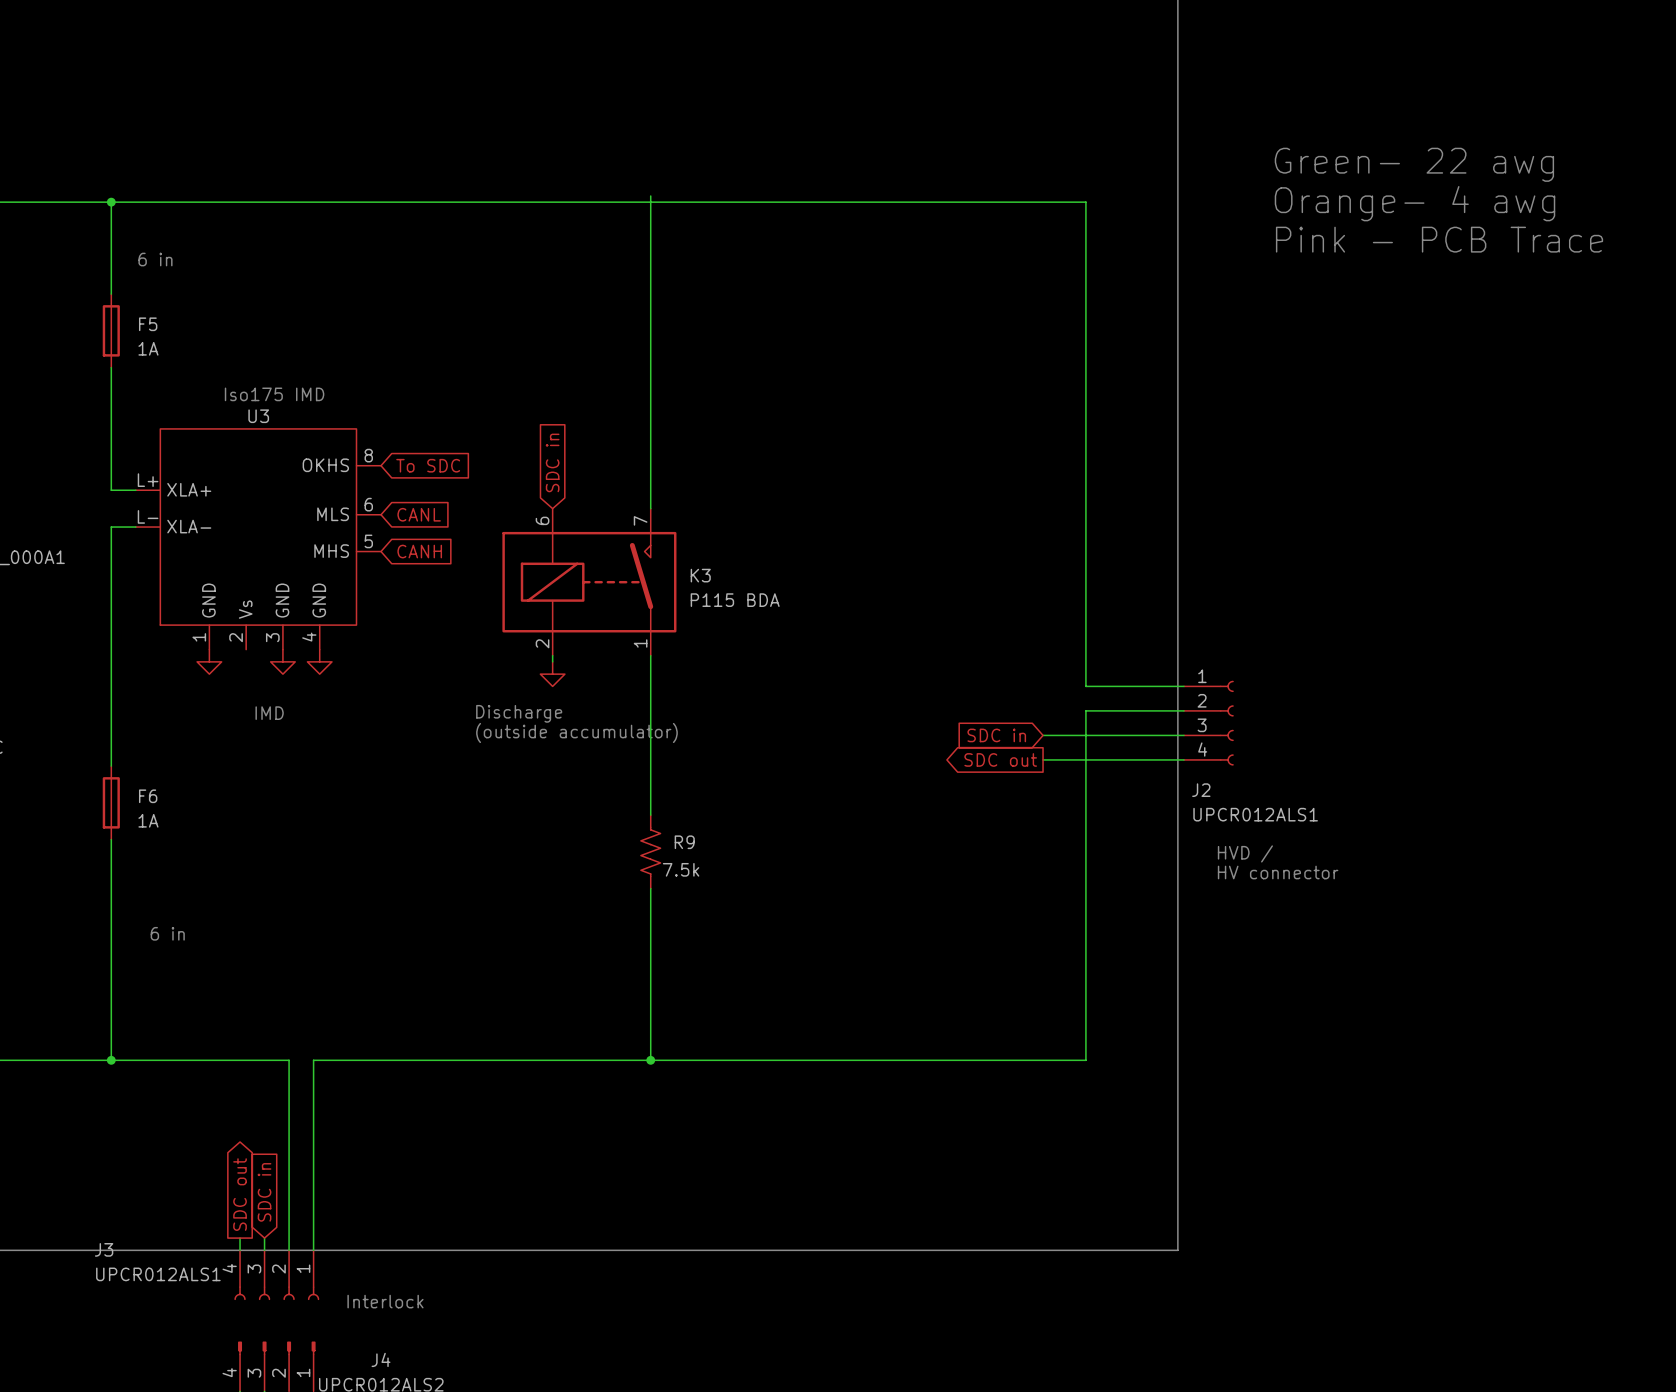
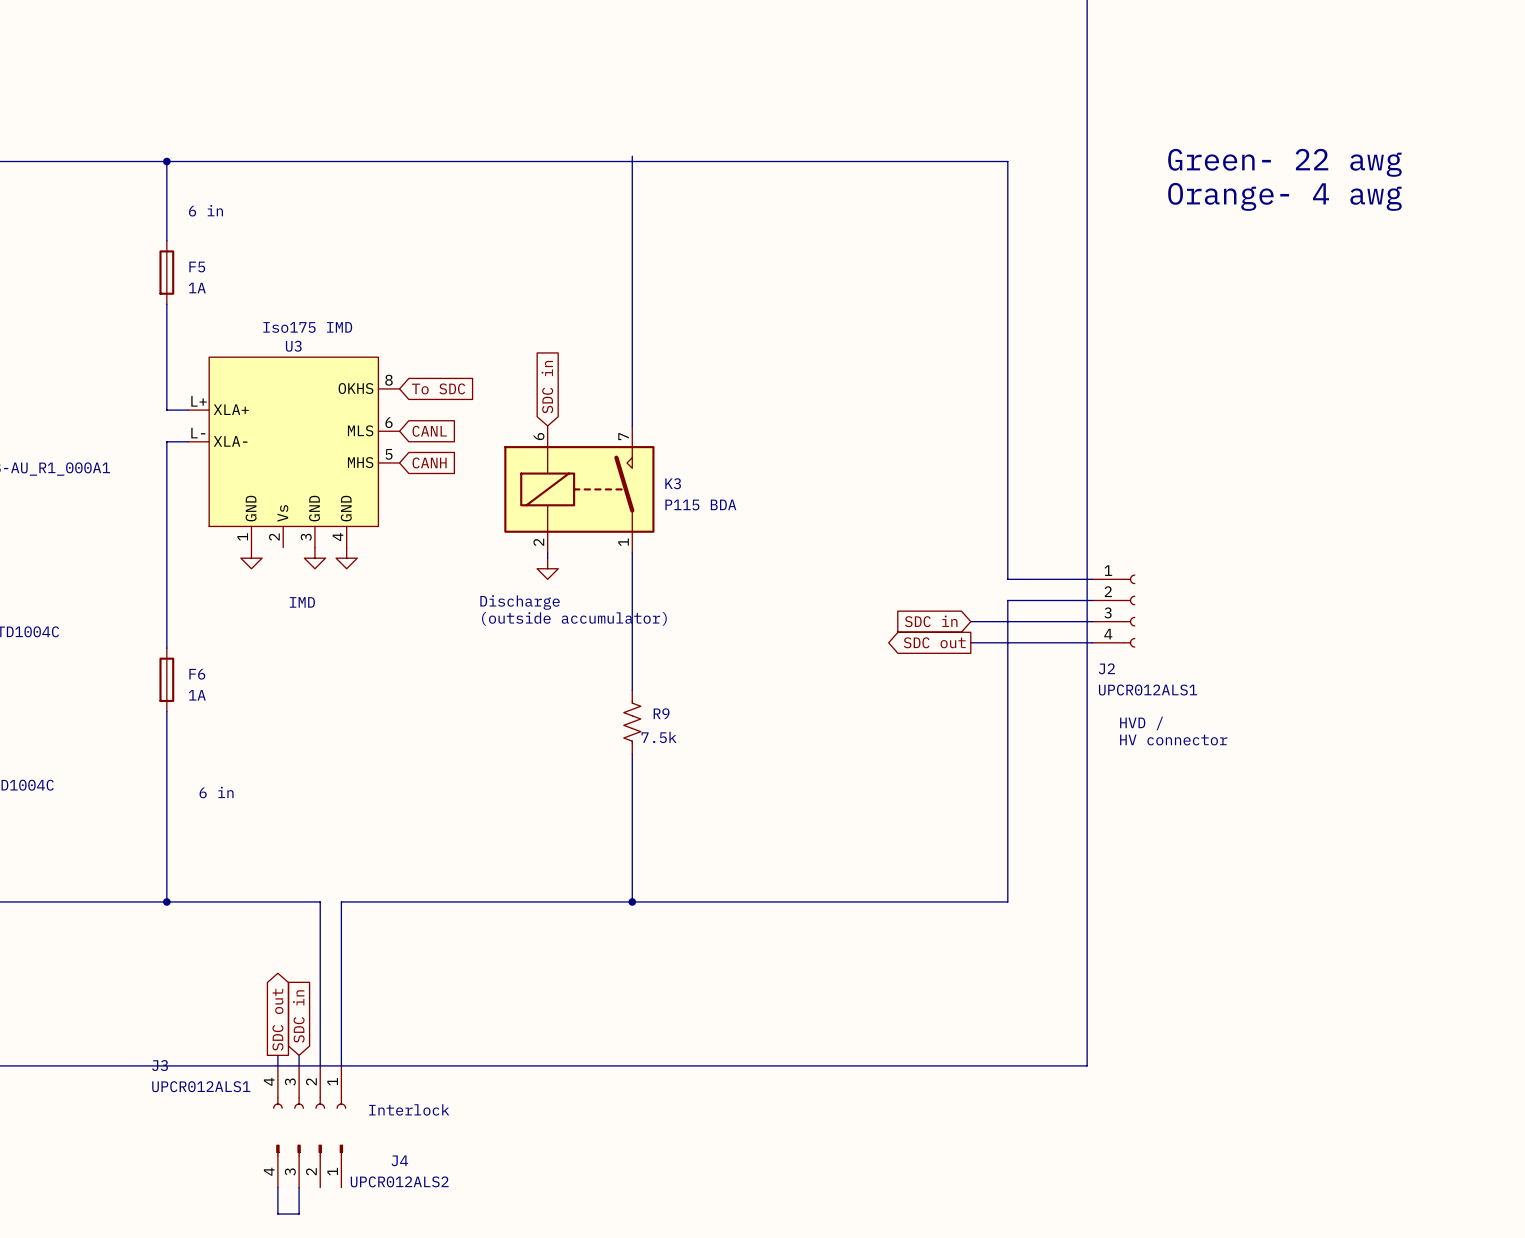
text: Green- 22 awg (1414, 164) -> none
text: Orange- 4 awg (1414, 203) -> Green- 22 awg (1284, 162)
text: Pink - PCB Trace (1439, 239) -> Orange- 4 awg (1284, 196)

